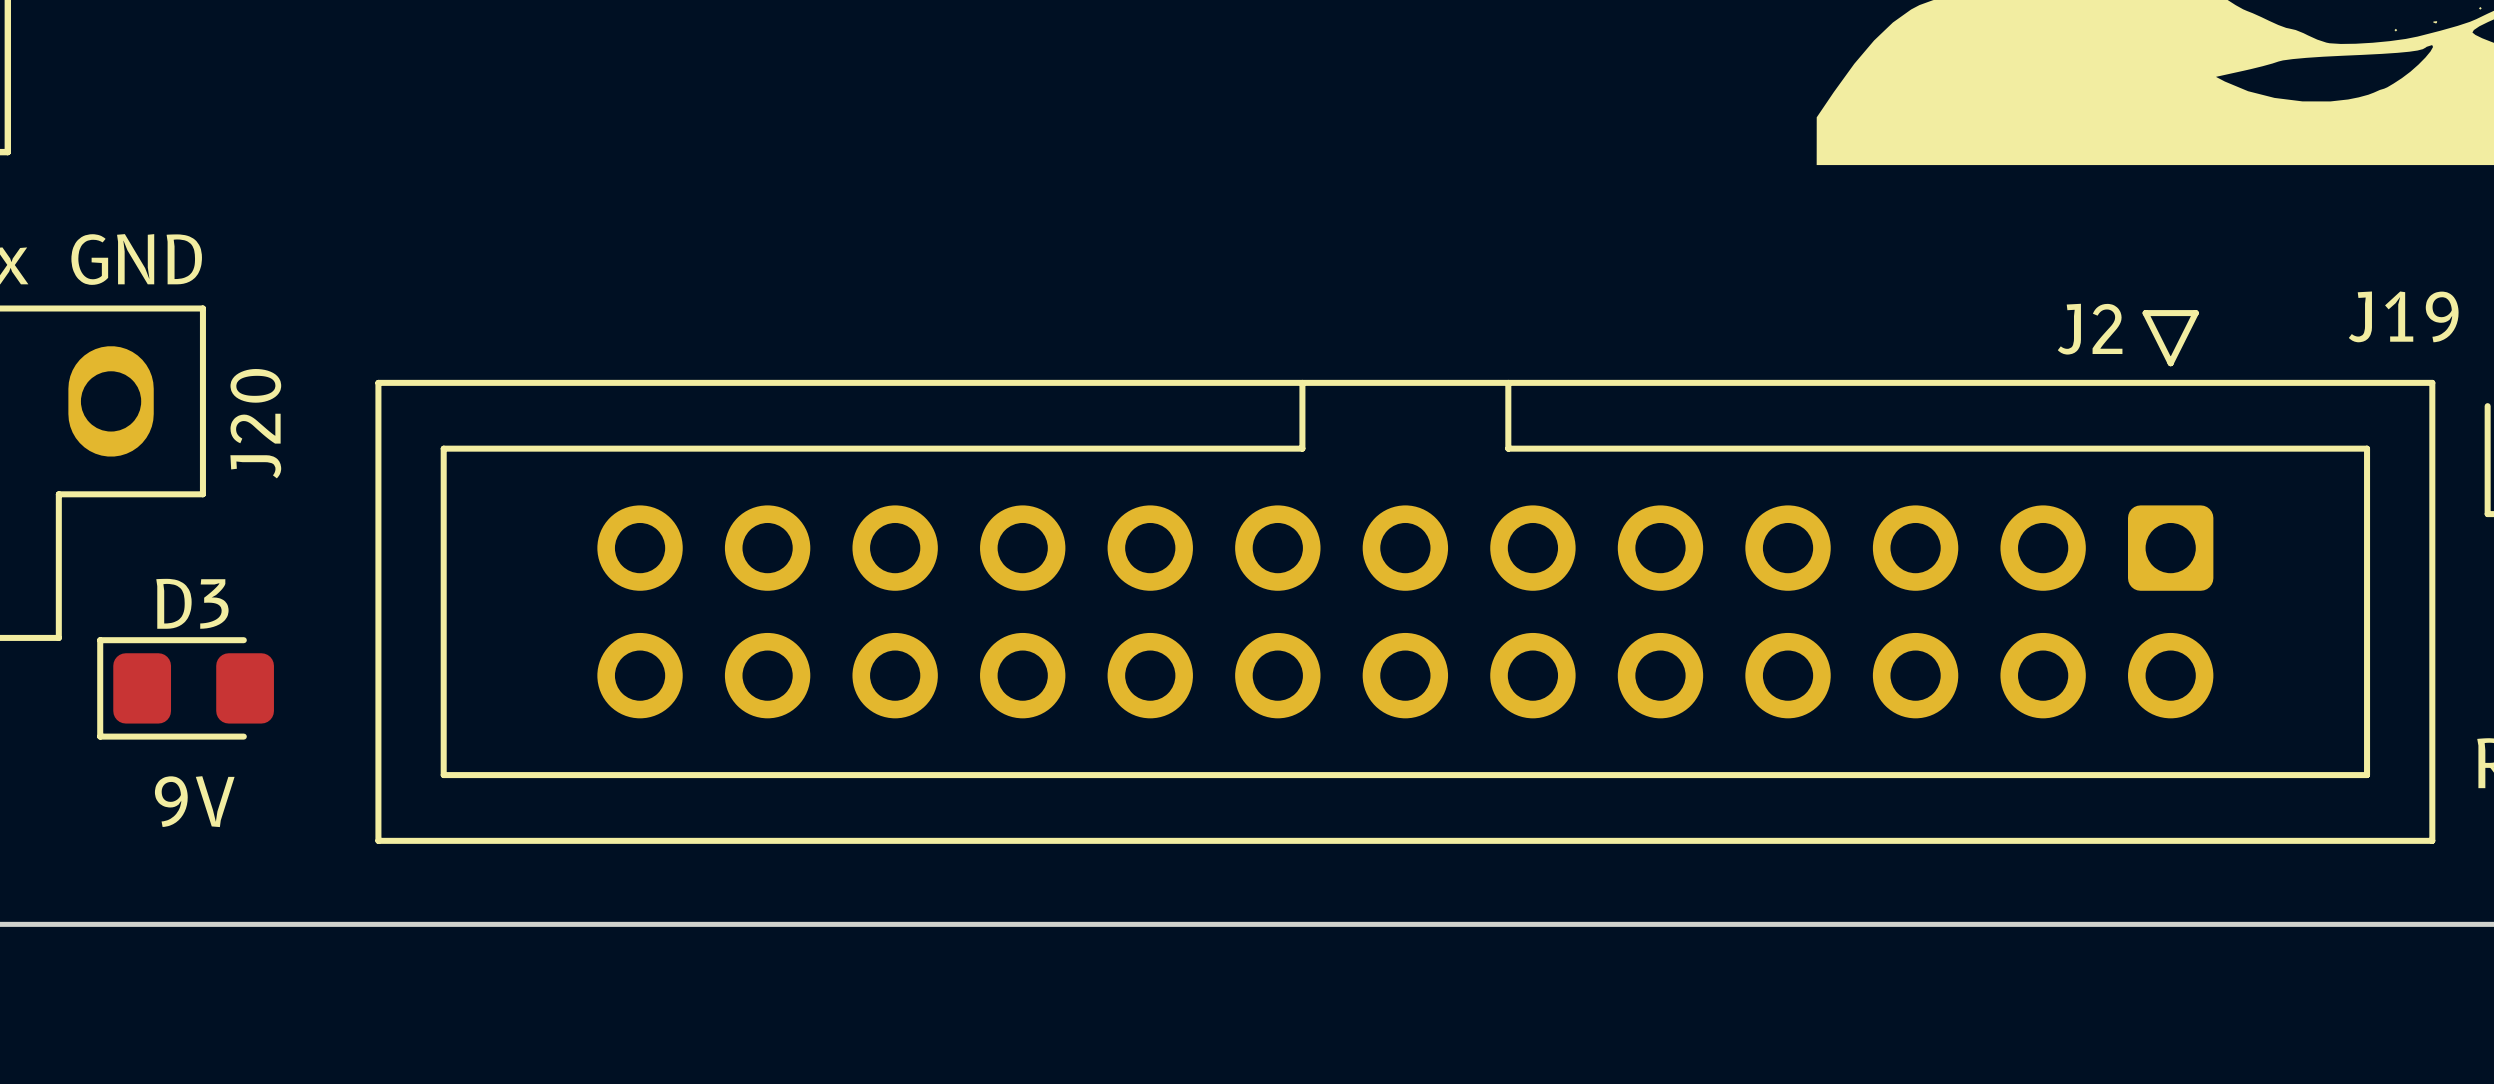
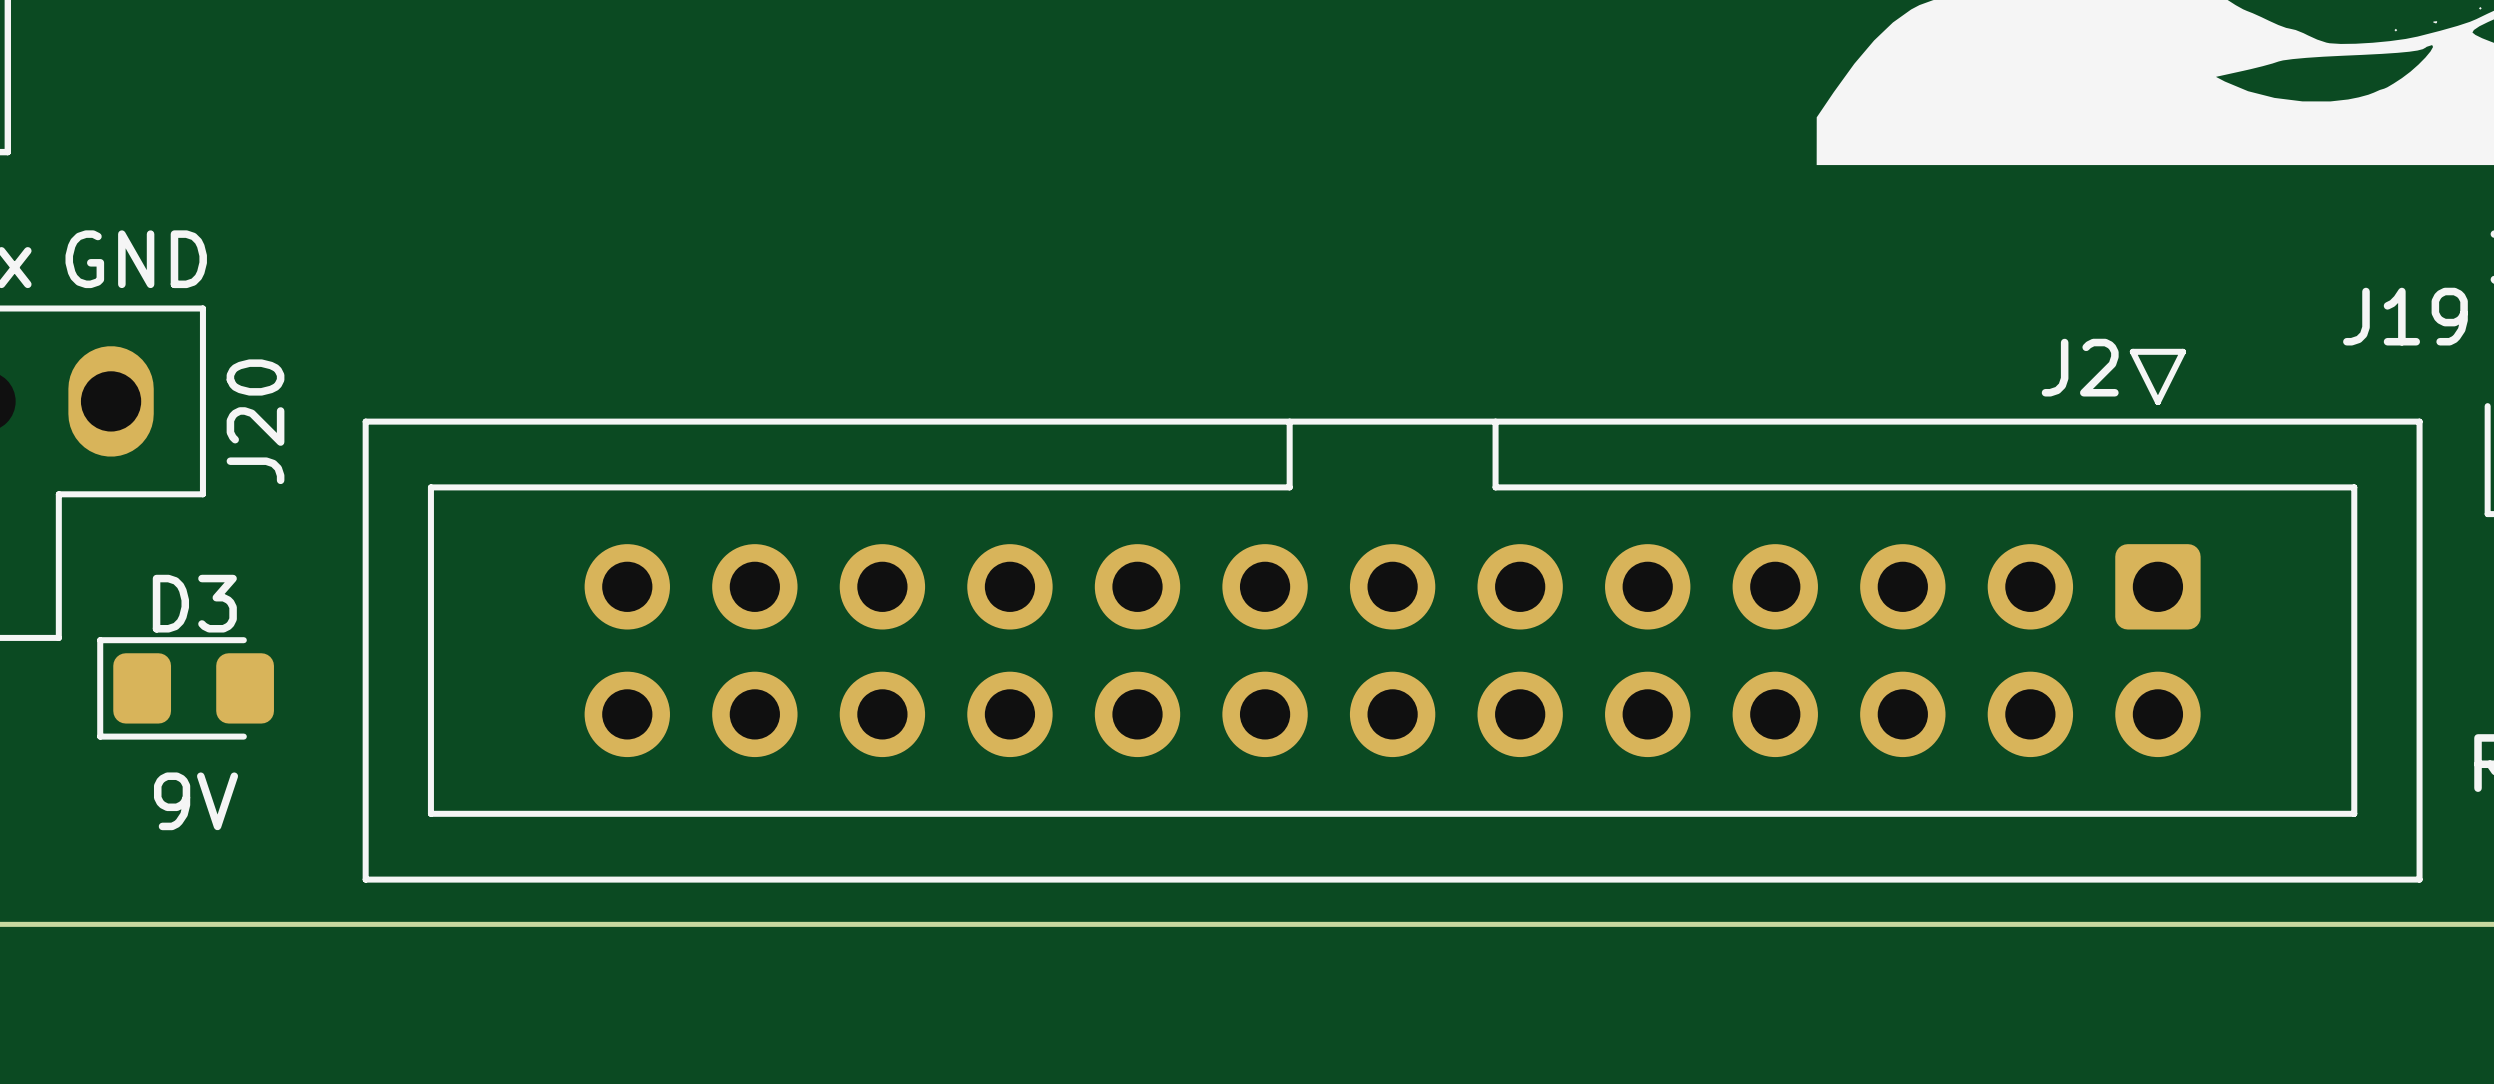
J2 position: (1405, 576) -> (1392, 615)

